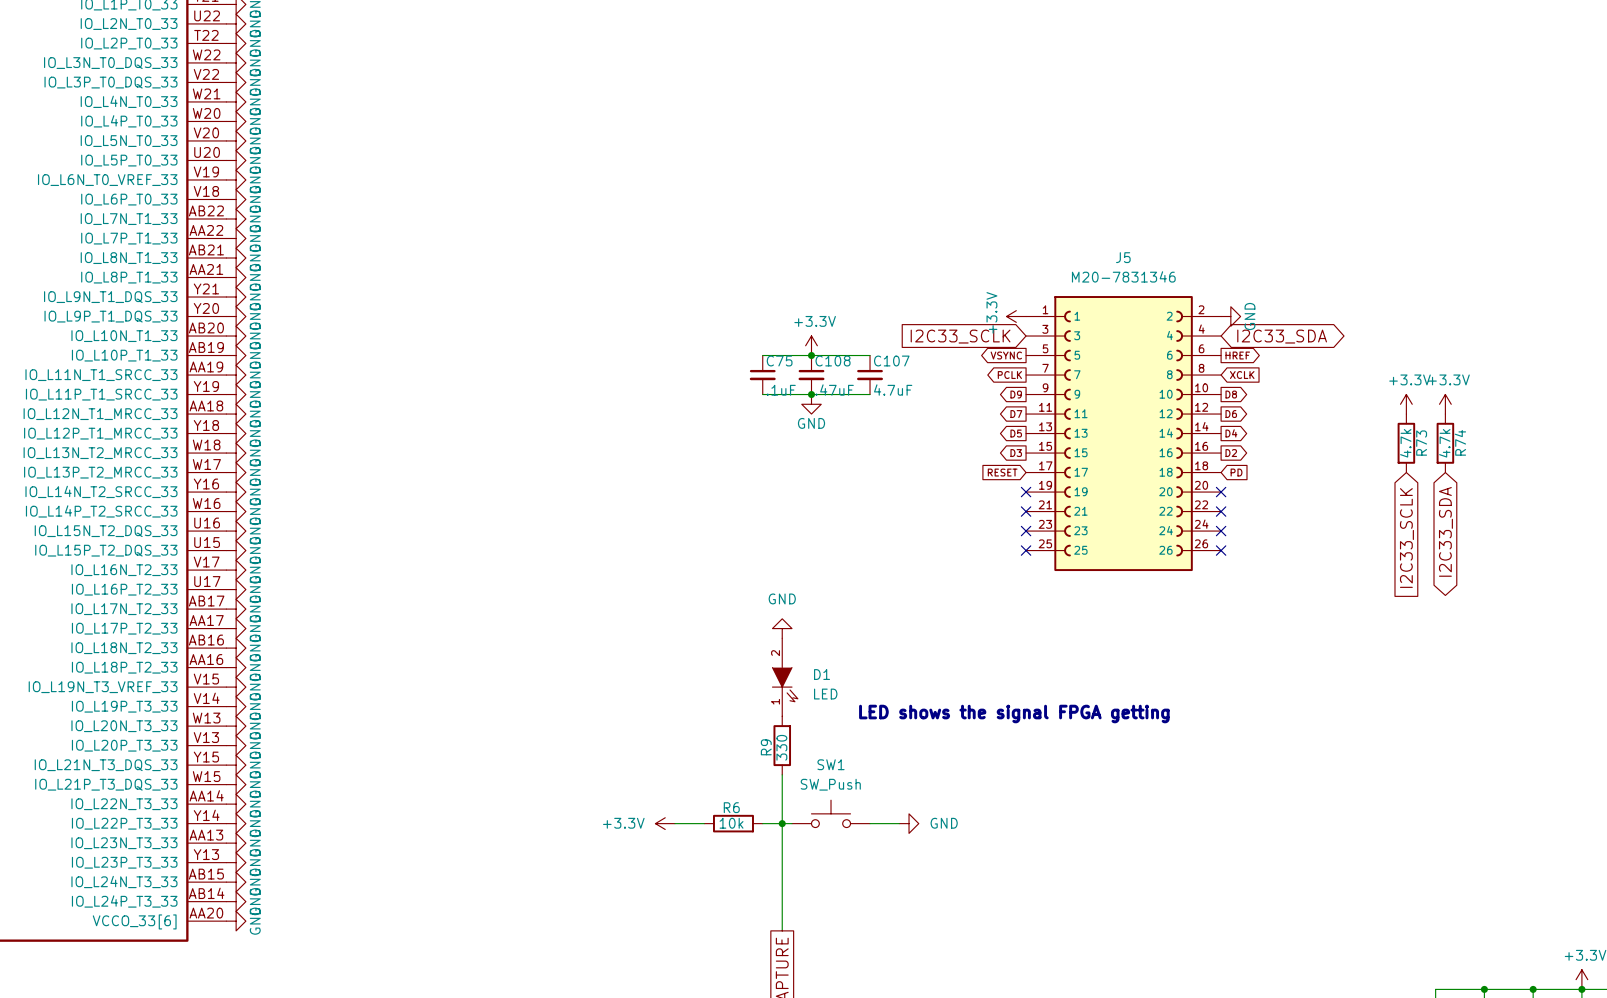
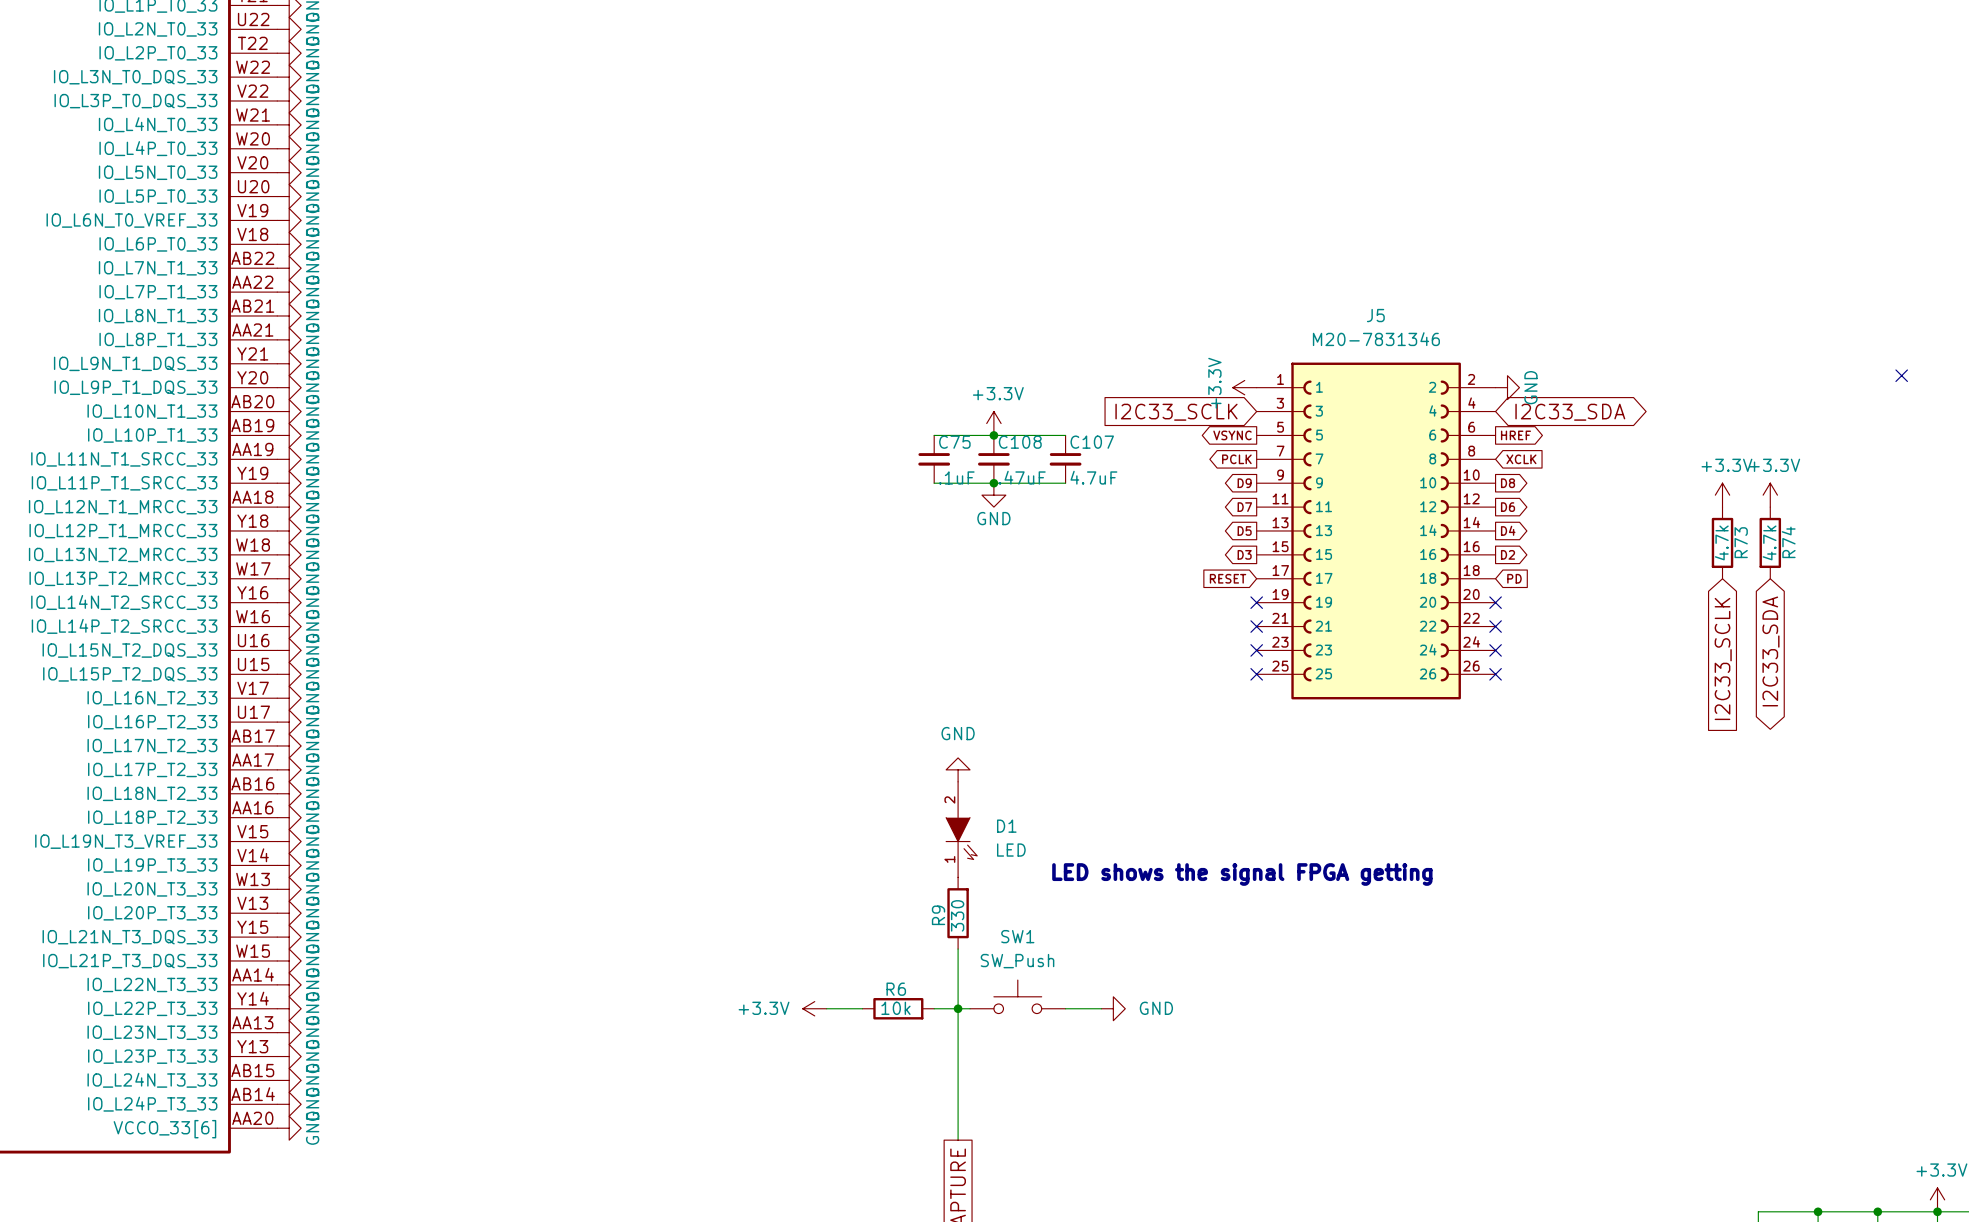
no-connect mark: none -> (1901, 375)

